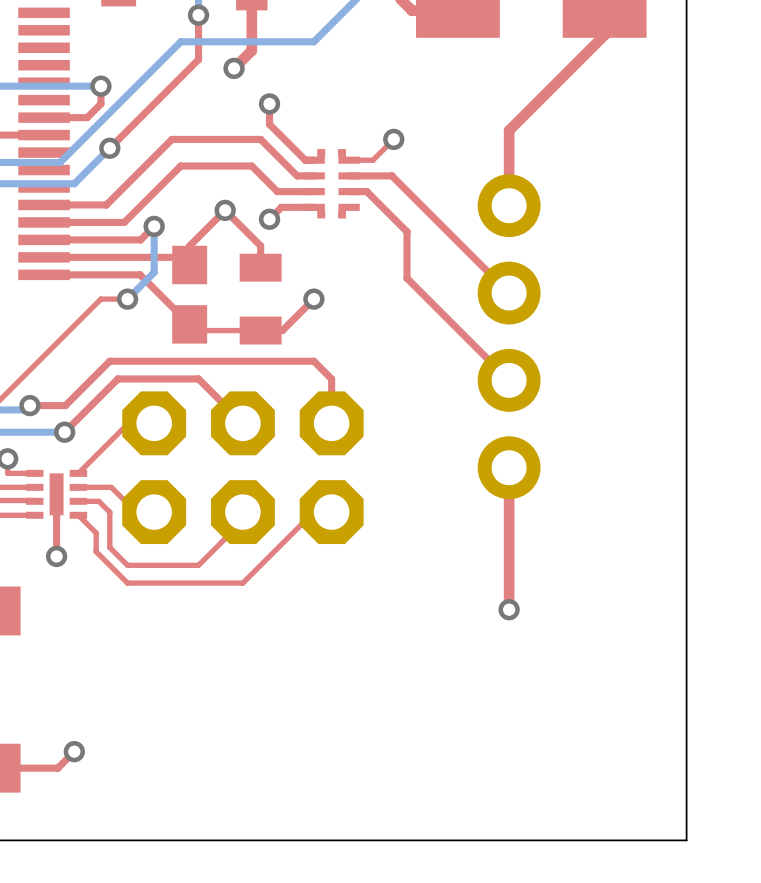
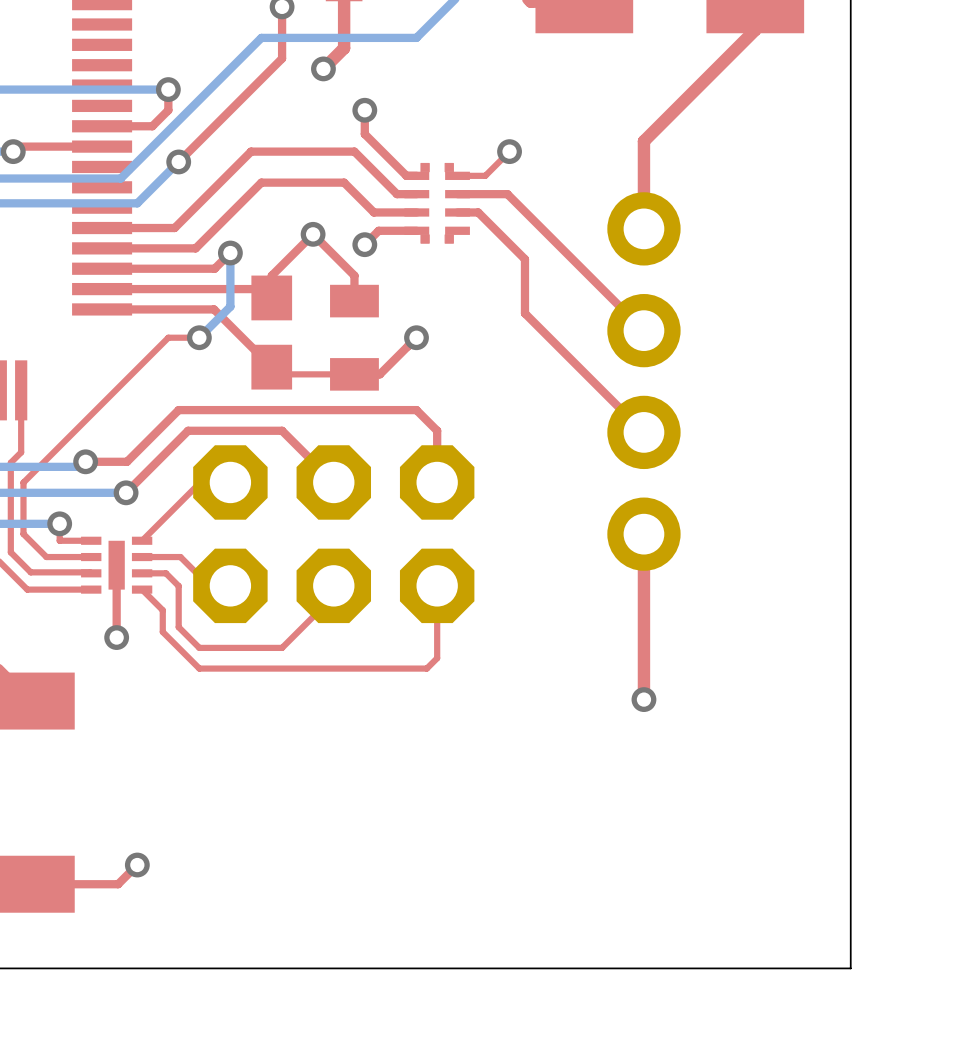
top track: (331, 512) (313, 512) (242, 583) -> (437, 585) (437, 658) (426, 668) (333, 668)

